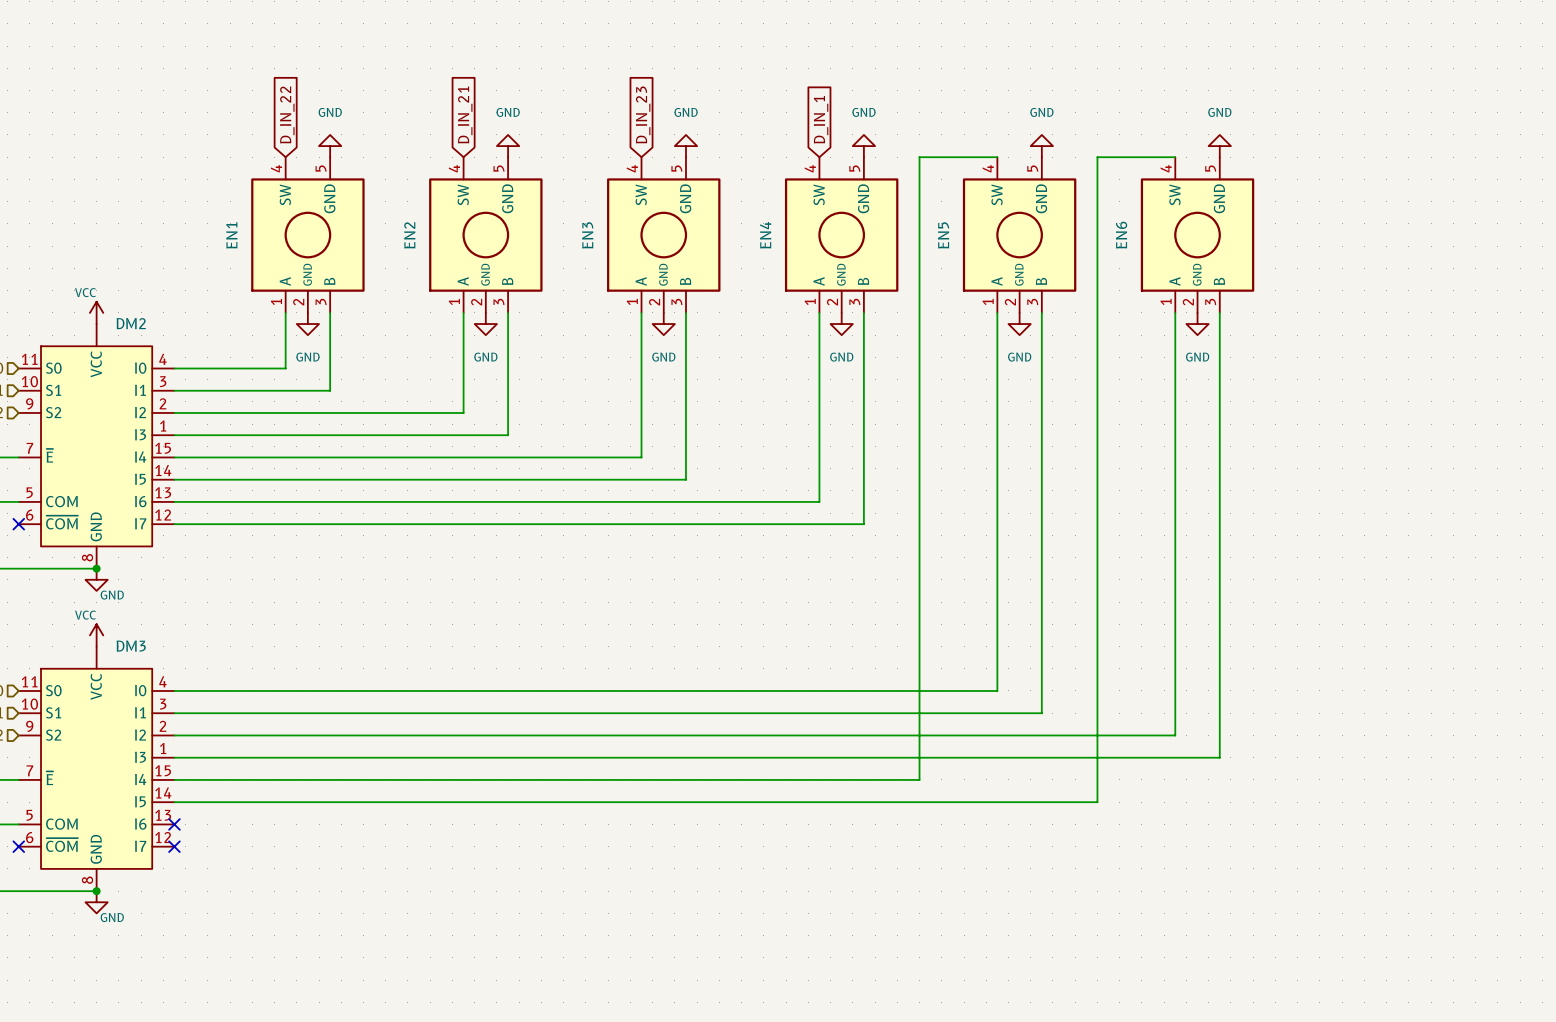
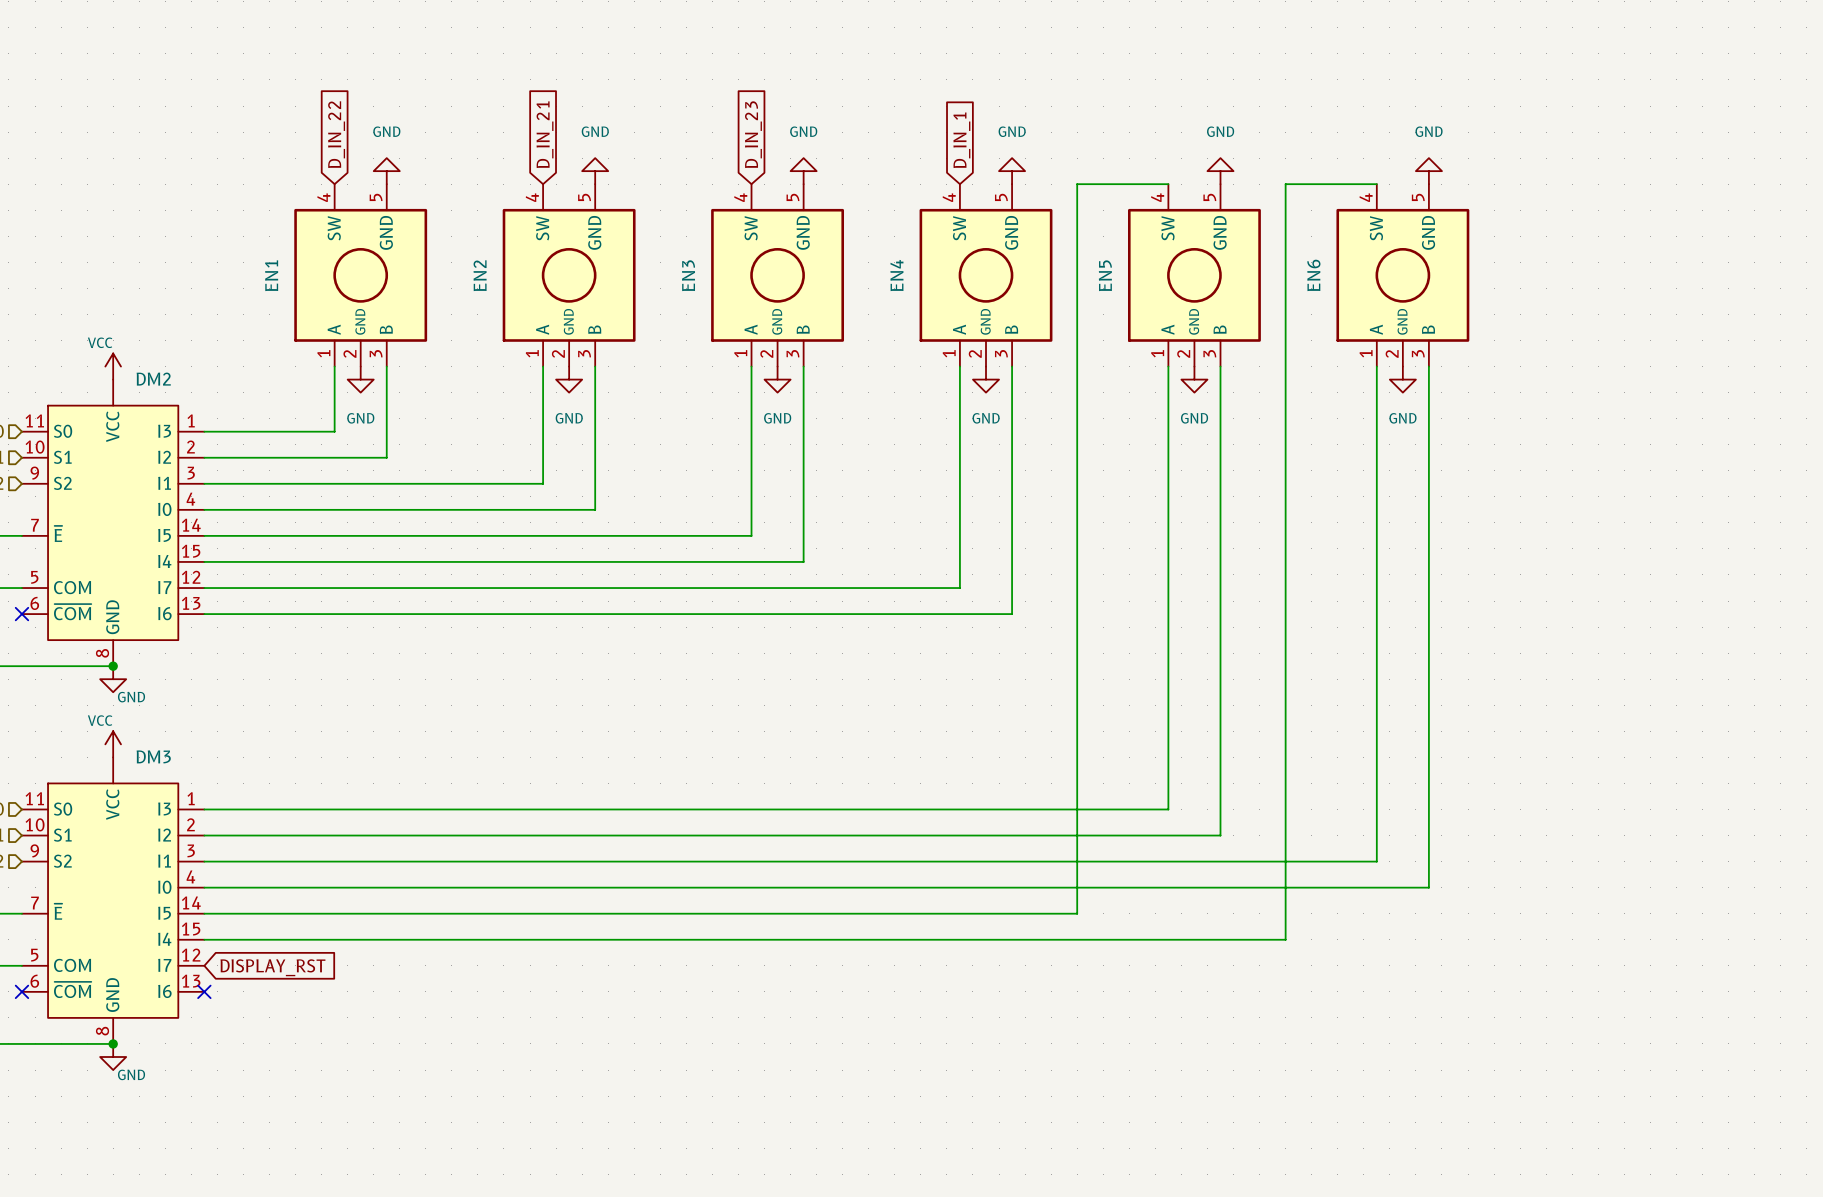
DM2 symbol: [18, 324, 175, 569] -> [21, 379, 205, 667]
DM3 symbol: [18, 646, 175, 892] -> [21, 757, 205, 1044]
no-connect mark: (174, 824) -> none
global label: none -> DISPLAY_RST (272, 967)

